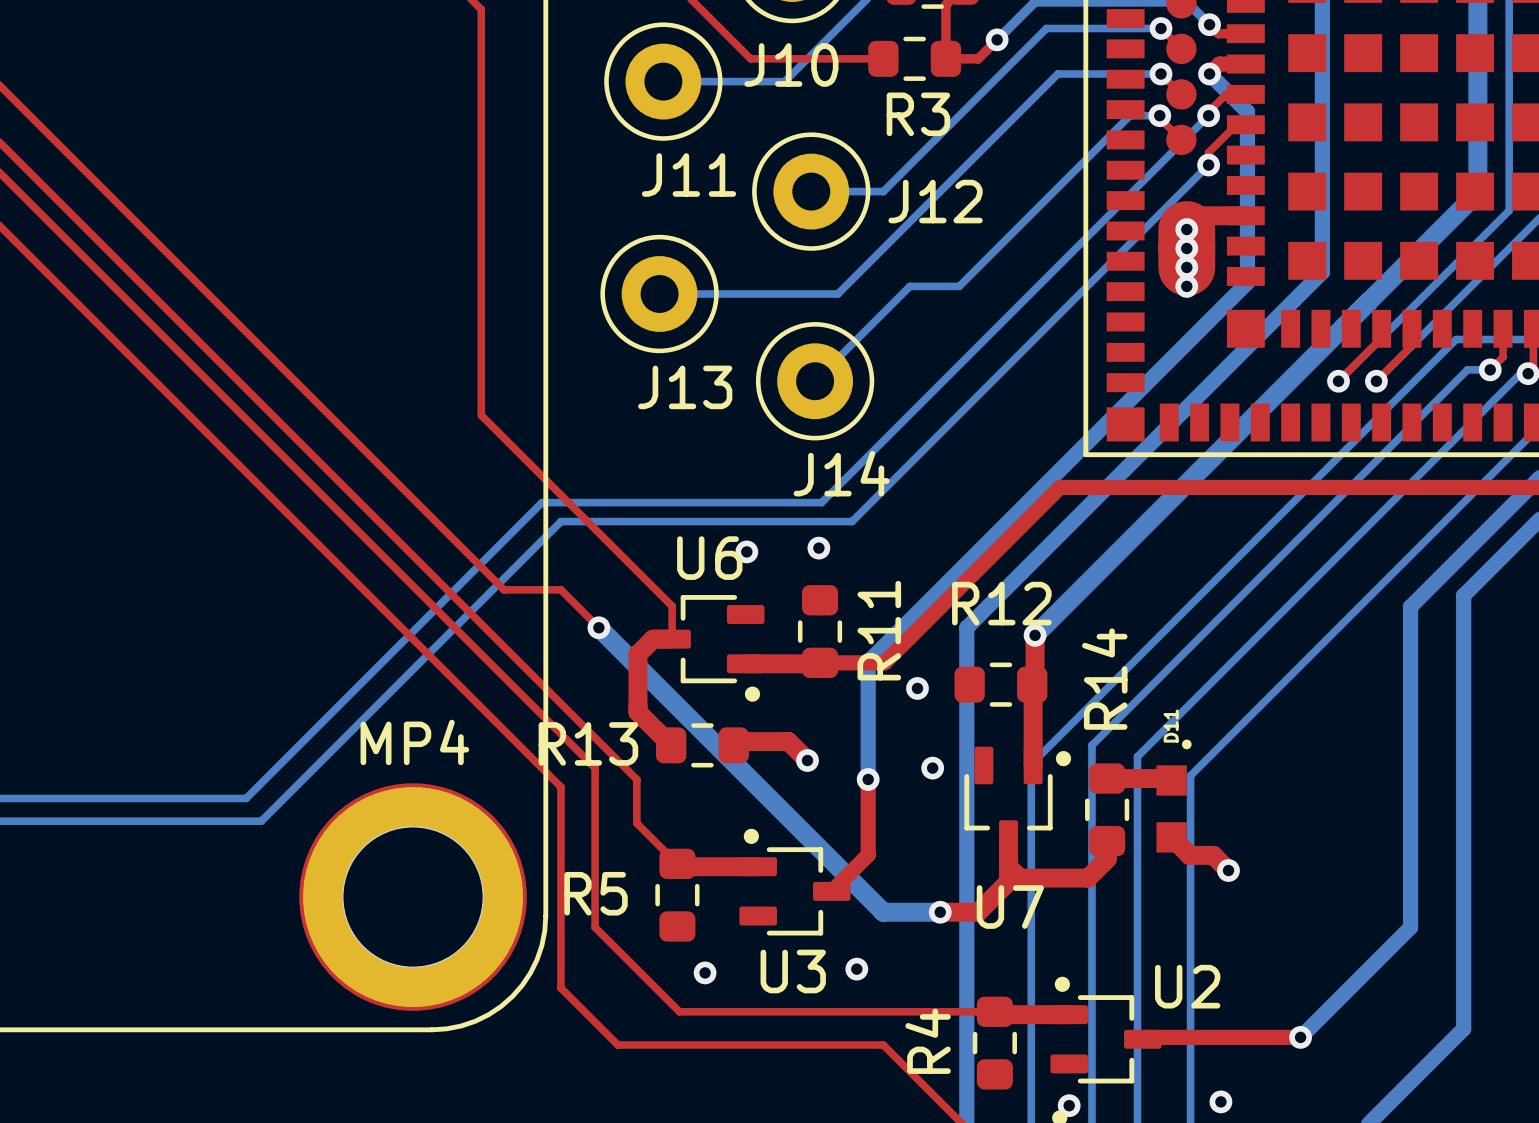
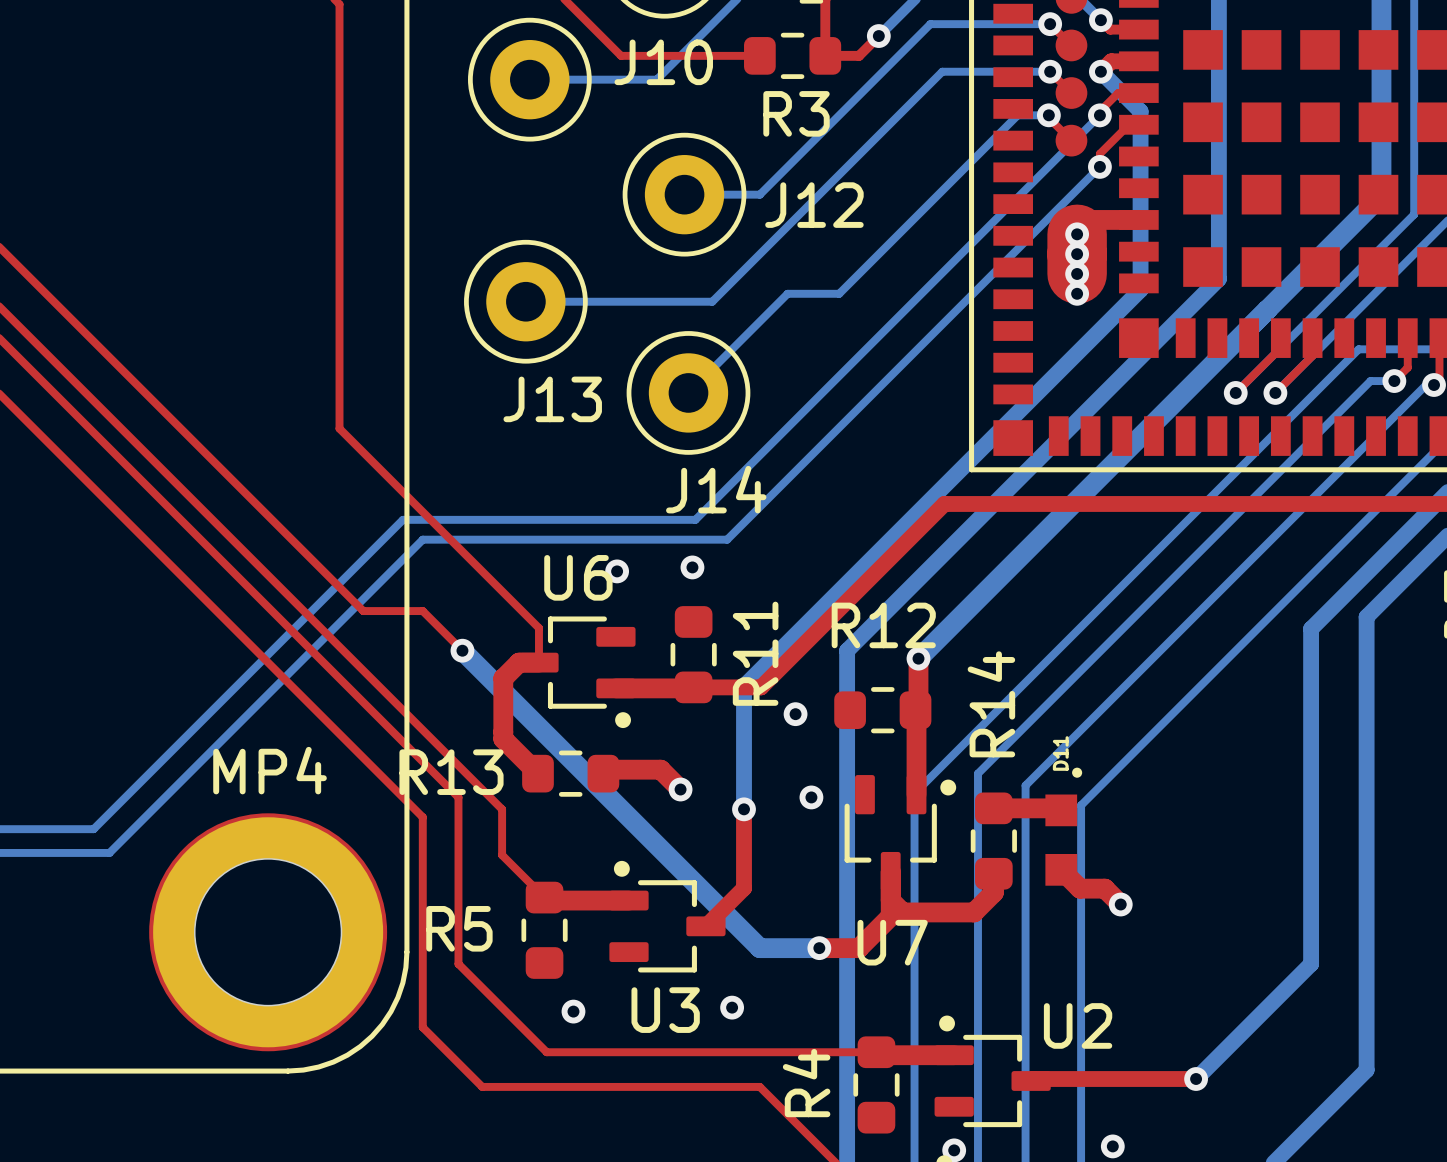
J11 name: J11 (689, 175) -> none

